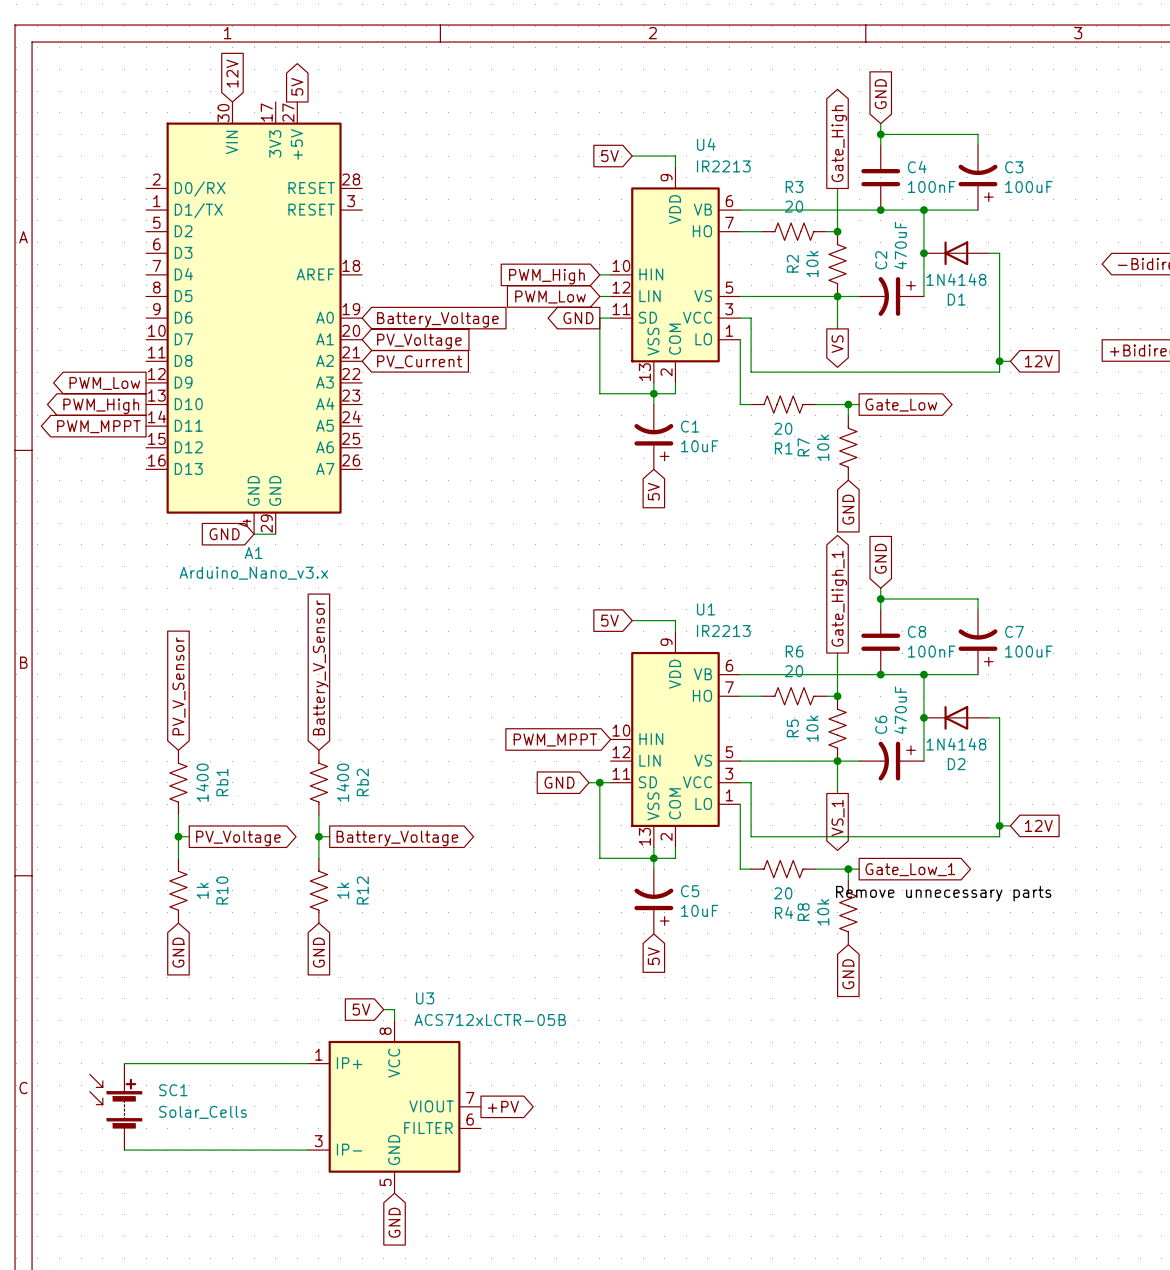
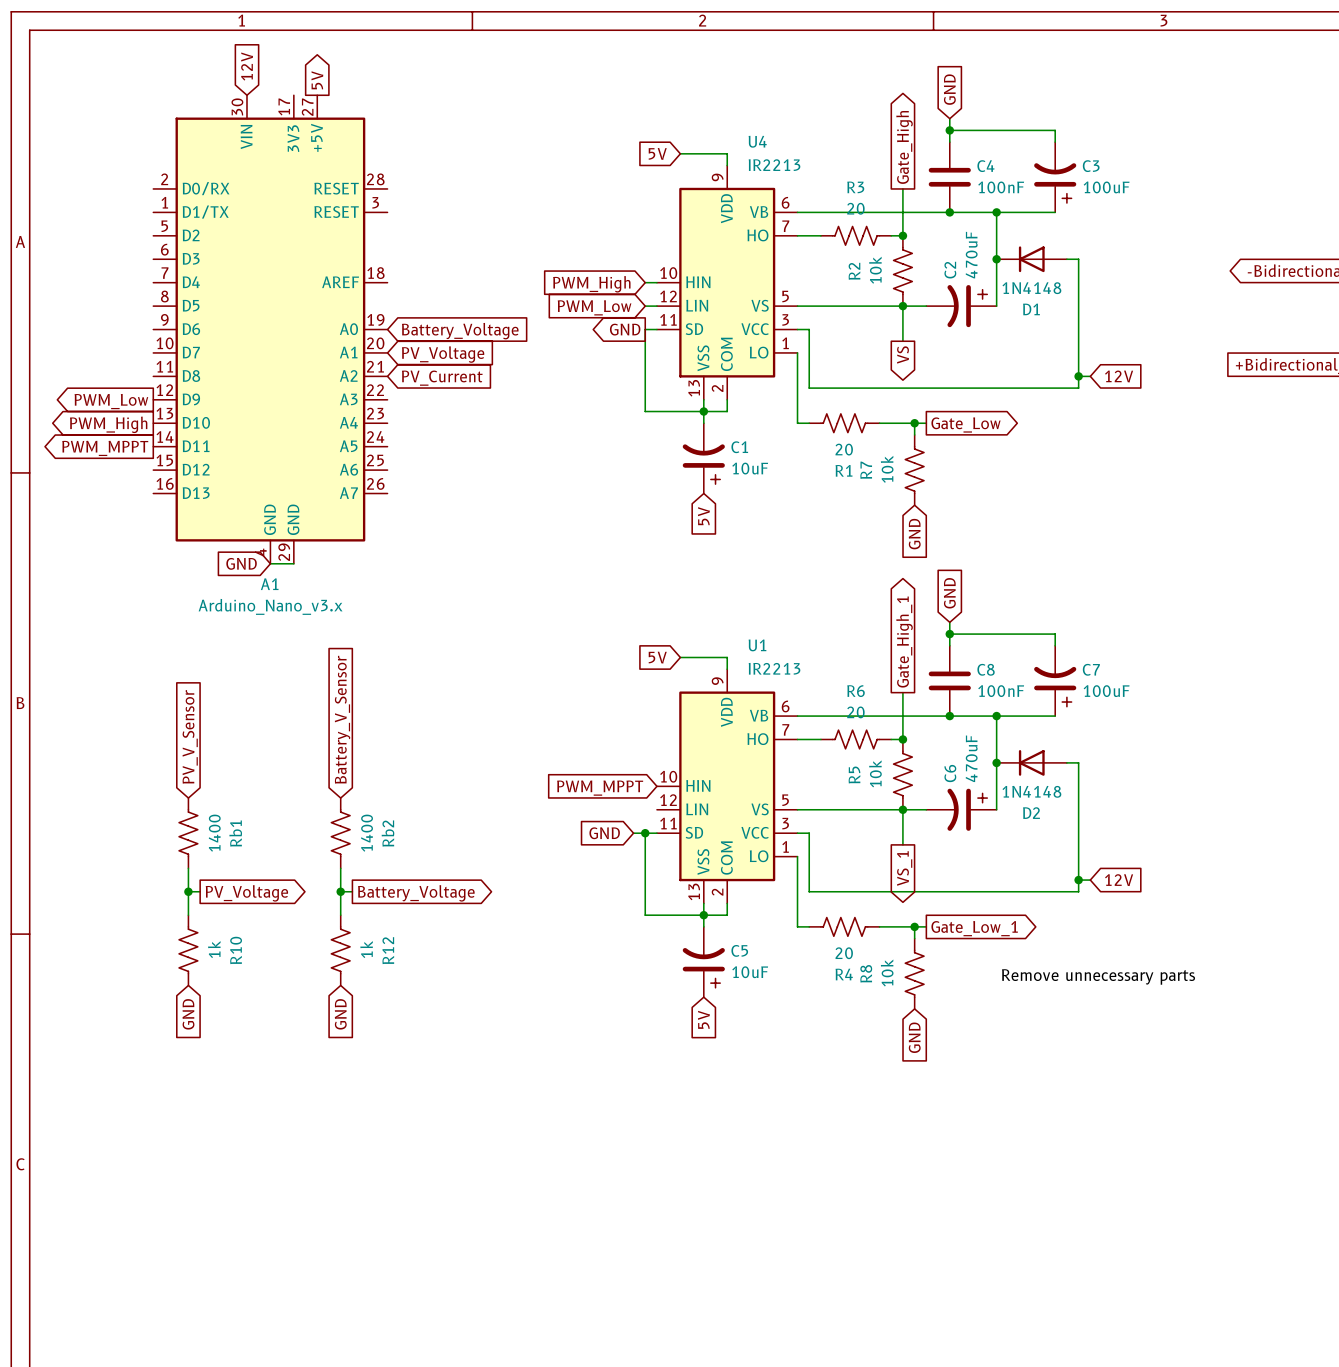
label position: Remove unnecessary parts (943, 893) -> Remove unnecessary parts (1098, 976)
global label: 5V (361, 1009) -> none
wire: (383, 1009) (394, 1009) (394, 1020) -> none
wire: (124, 1063) (308, 1063) -> none
SC1: Solar_Cells (115, 1106) -> none
U3: ACS712xLCTR-05B (394, 1106) -> none
global label: +PV (503, 1106) -> none
wire: (124, 1150) (308, 1150) -> none
global label: GND (394, 1222) -> none

